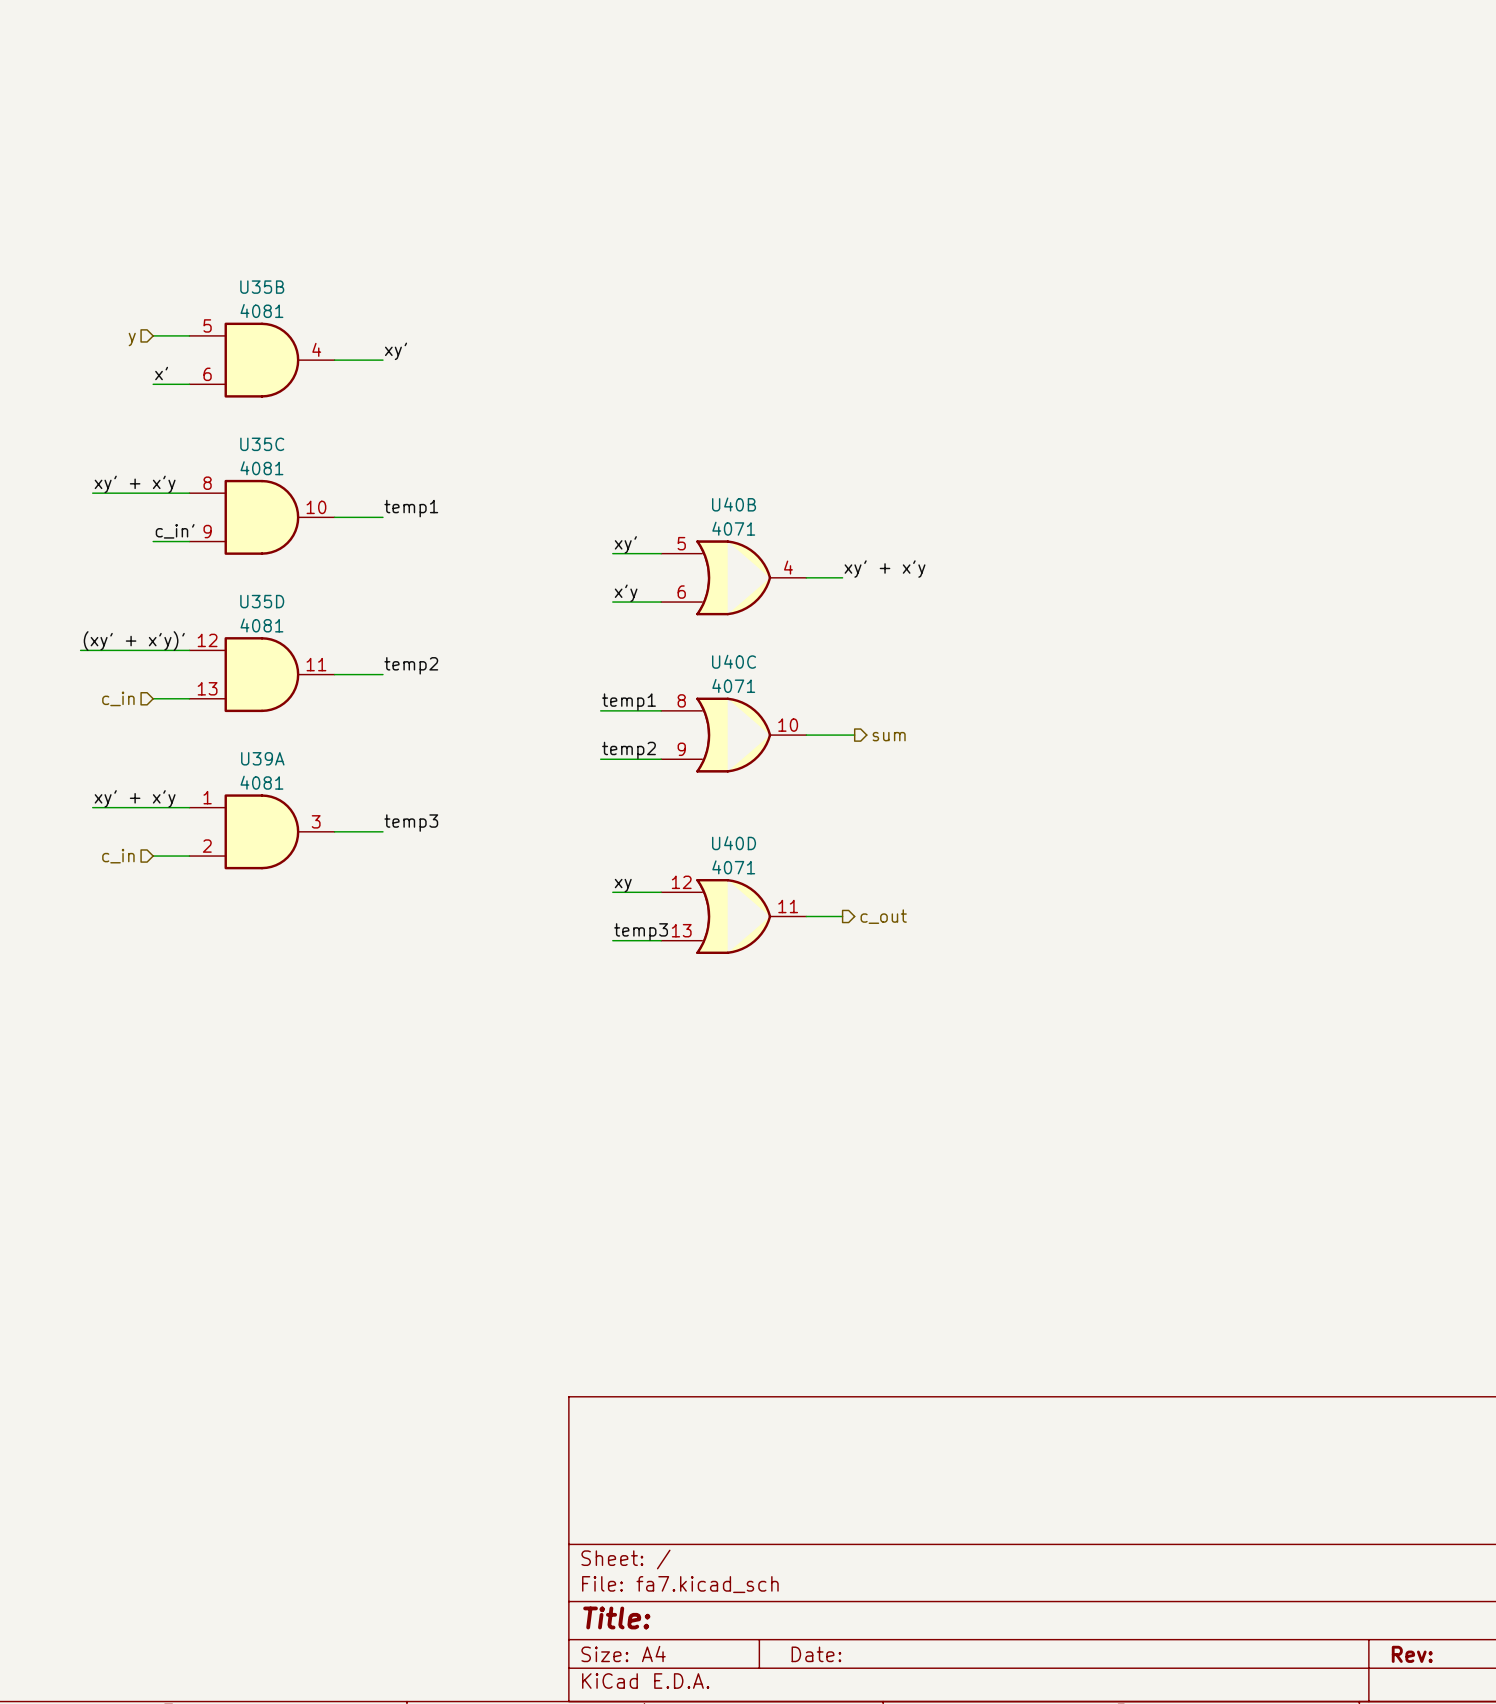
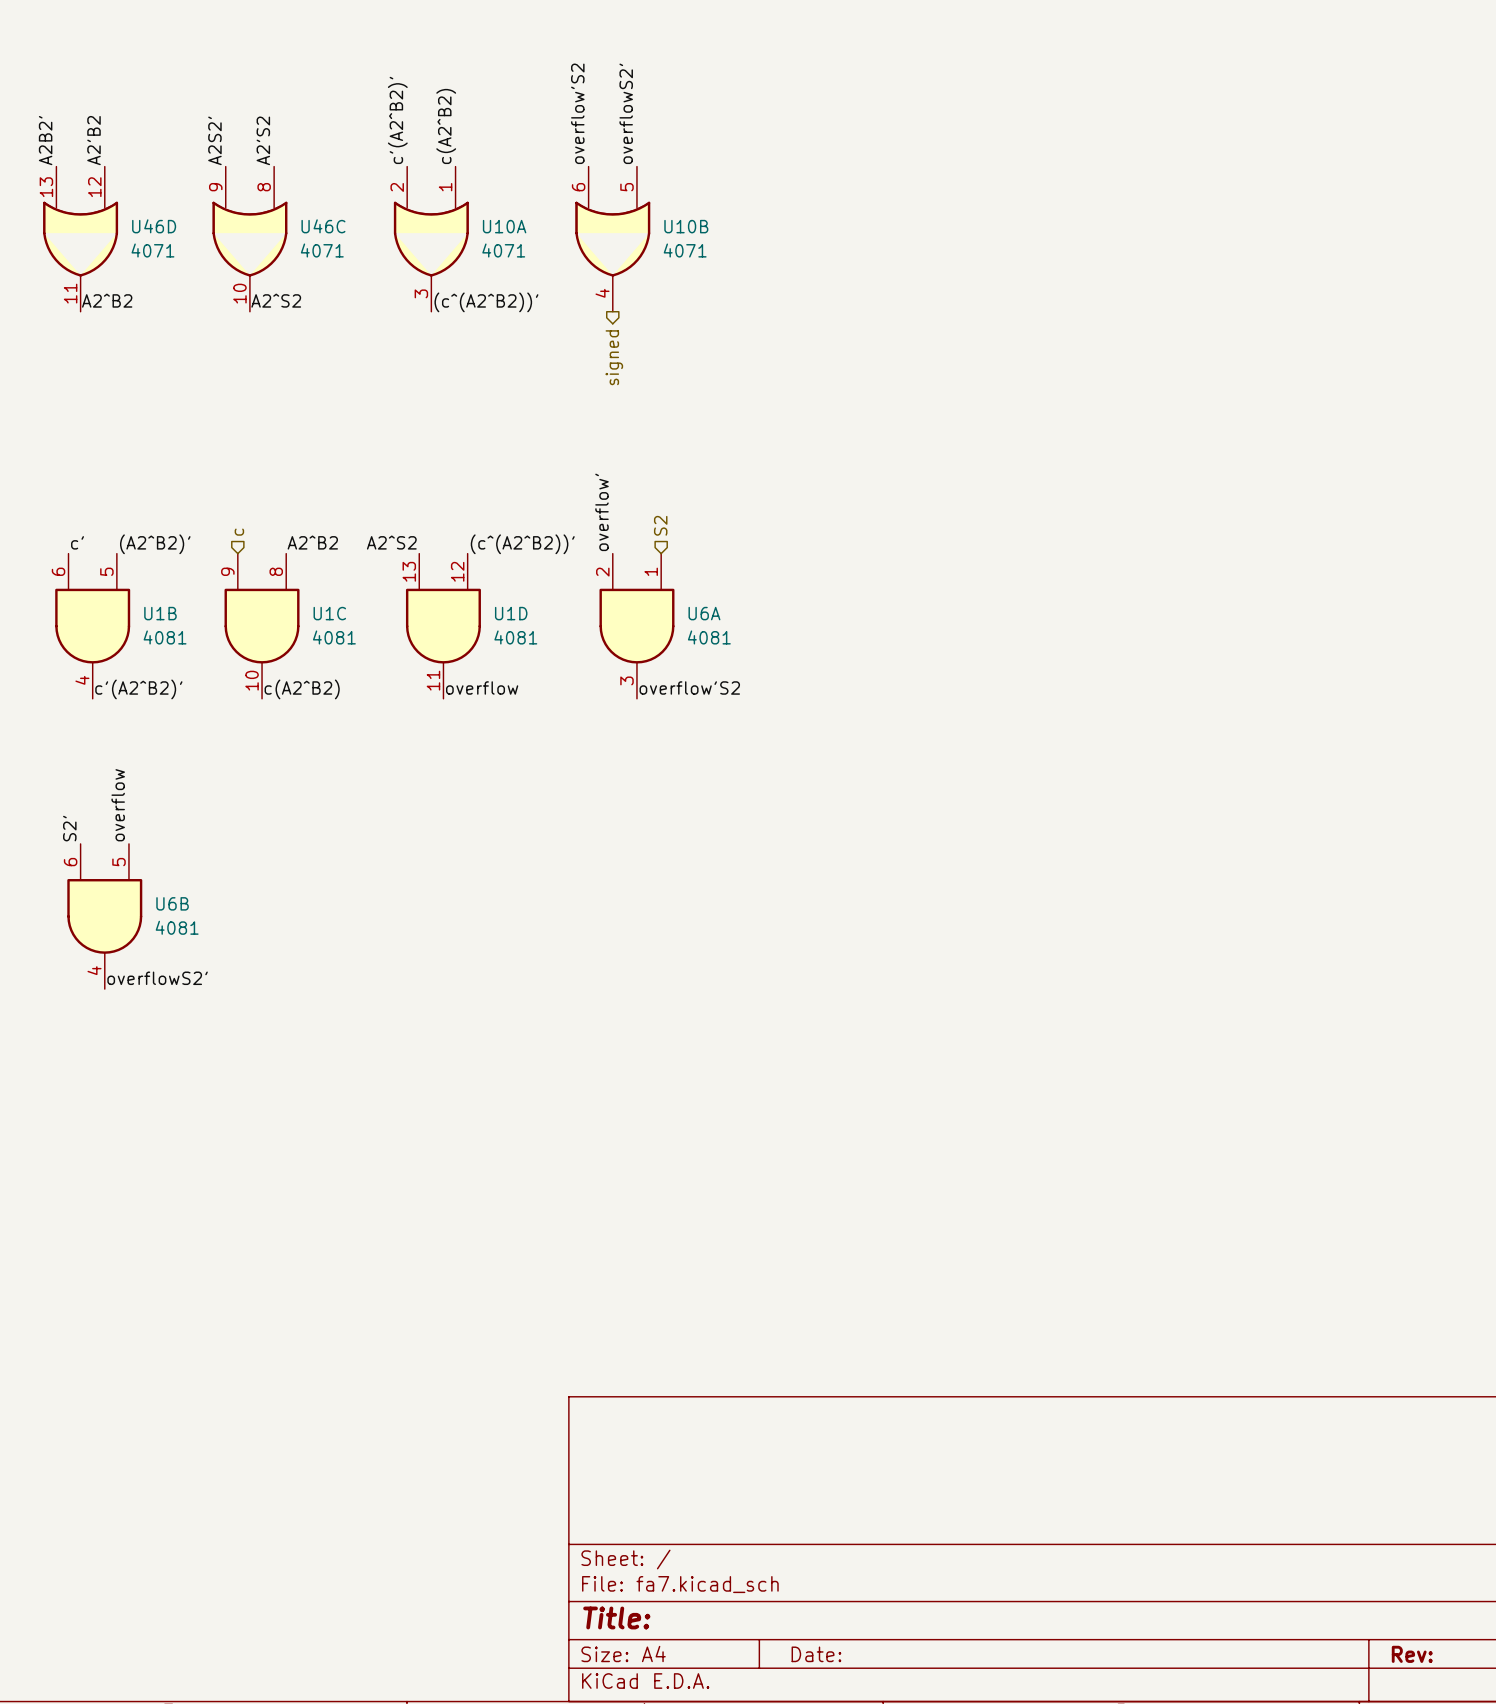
label: none -> overflow'S2 (577, 113)
label: none -> overflowS2' (626, 113)
label: none -> c'(A2^B2)' (397, 120)
label: none -> c(A2^B2) (446, 126)
label: none -> A2B2' (45, 140)
label: none -> A2'B2 (93, 140)
label: none -> A2S2' (214, 140)
label: none -> A2'S2 (263, 140)
U46D: none -> 4071 (80, 239)
U46C: none -> 4071 (249, 239)
U10A: none -> 4071 (431, 239)
U10B: none -> 4071 (612, 239)
label: none -> A2^B2 (107, 300)
label: none -> A2^S2 (276, 300)
label: none -> (c^(A2^B2))' (486, 302)
wire: (153, 335) (189, 335) -> none
hierarchical label: y (132, 339) -> none
label: xy' (396, 351) -> none
hierarchical label: none -> signed (614, 357)
U35B: 4081 (262, 360) -> none
wire: (334, 360) (382, 360) -> none
label: x' (161, 373) -> none
wire: (153, 384) (189, 384) -> none
label: xy' + x'y (135, 484) -> none
wire: (92, 493) (189, 493) -> none
label: temp1 (411, 508) -> none
U35C: 4081 (262, 517) -> none
wire: (334, 517) (382, 517) -> none
hierarchical label: none -> S2 (660, 525)
label: c_in' (175, 531) -> none
hierarchical label: none -> c (239, 532)
wire: (153, 541) (189, 541) -> none
label: none -> c' (77, 542)
label: none -> A2^B2 (312, 542)
label: none -> A2^S2 (391, 542)
label: none -> (A2^B2)' (155, 544)
label: none -> (c^(A2^B2))' (522, 544)
label: xy' (625, 544) -> overflow' (601, 512)
wire: (612, 553) (661, 553) -> none
label: xy' + x'y (885, 569) -> none
U40B: 4071 (733, 577) -> none
wire: (806, 577) (842, 577) -> none
label: x'y (626, 593) -> none
U1B: none -> 4081 (92, 626)
U1C: none -> 4081 (262, 626)
U1D: none -> 4081 (443, 626)
U6A: none -> 4081 (636, 626)
label: (xy' + x'y)' (134, 641) -> none
wire: (80, 650) (189, 650) -> none
label: temp2 (411, 665) -> none
U35D: 4081 (262, 674) -> none
wire: (334, 674) (382, 674) -> none
label: none -> overflow (482, 687)
label: none -> overflow'S2 (689, 687)
label: none -> c'(A2^B2)' (138, 689)
label: none -> c(A2^B2) (302, 689)
hierarchical label: c_in (118, 698) -> none
wire: (153, 698) (189, 698) -> none
label: temp1 (629, 702) -> none
wire: (600, 710) (661, 710) -> none
U40C: 4071 (733, 735) -> none
wire: (806, 735) (854, 735) -> none
hierarchical label: sum (889, 736) -> none
label: temp2 (629, 750) -> none
wire: (600, 759) (661, 759) -> none
label: xy' + x'y (135, 798) -> none
label: none -> overflow (118, 805)
wire: (92, 807) (189, 807) -> none
label: temp3 (411, 823) -> none
label: none -> S2' (69, 828)
U39A: 4081 (262, 831) -> none
wire: (334, 831) (382, 831) -> none
hierarchical label: c_in (118, 856) -> none
wire: (153, 856) (189, 856) -> none
label: xy (623, 885) -> none
wire: (612, 892) (661, 892) -> none
U6B: none -> 4081 (104, 916)
U40D: 4071 (733, 916) -> none
wire: (806, 916) (842, 916) -> none
hierarchical label: c_out (883, 916) -> none
label: temp3 (641, 931) -> none
wire: (612, 940) (661, 940) -> none
label: none -> overflowS2' (157, 978)

